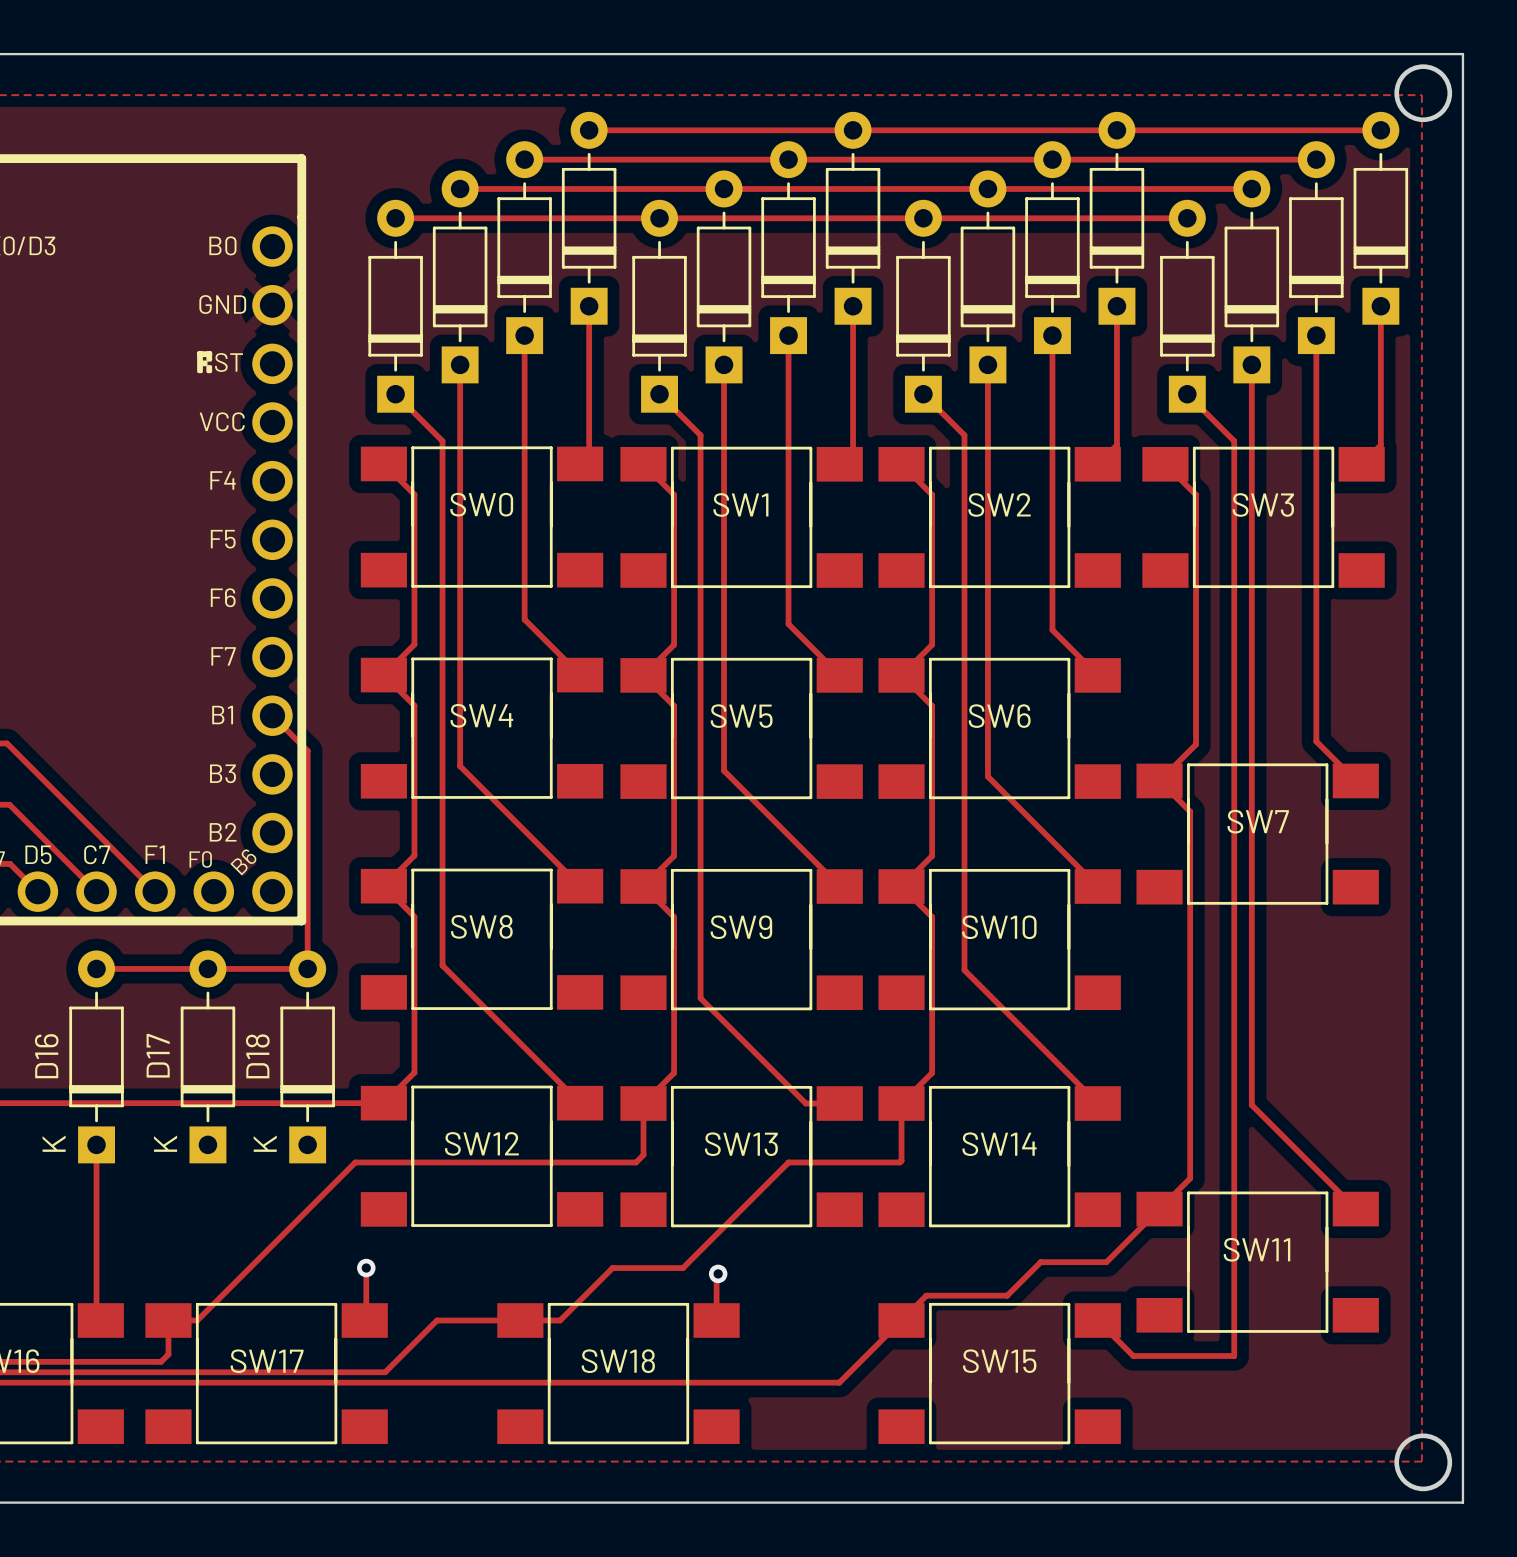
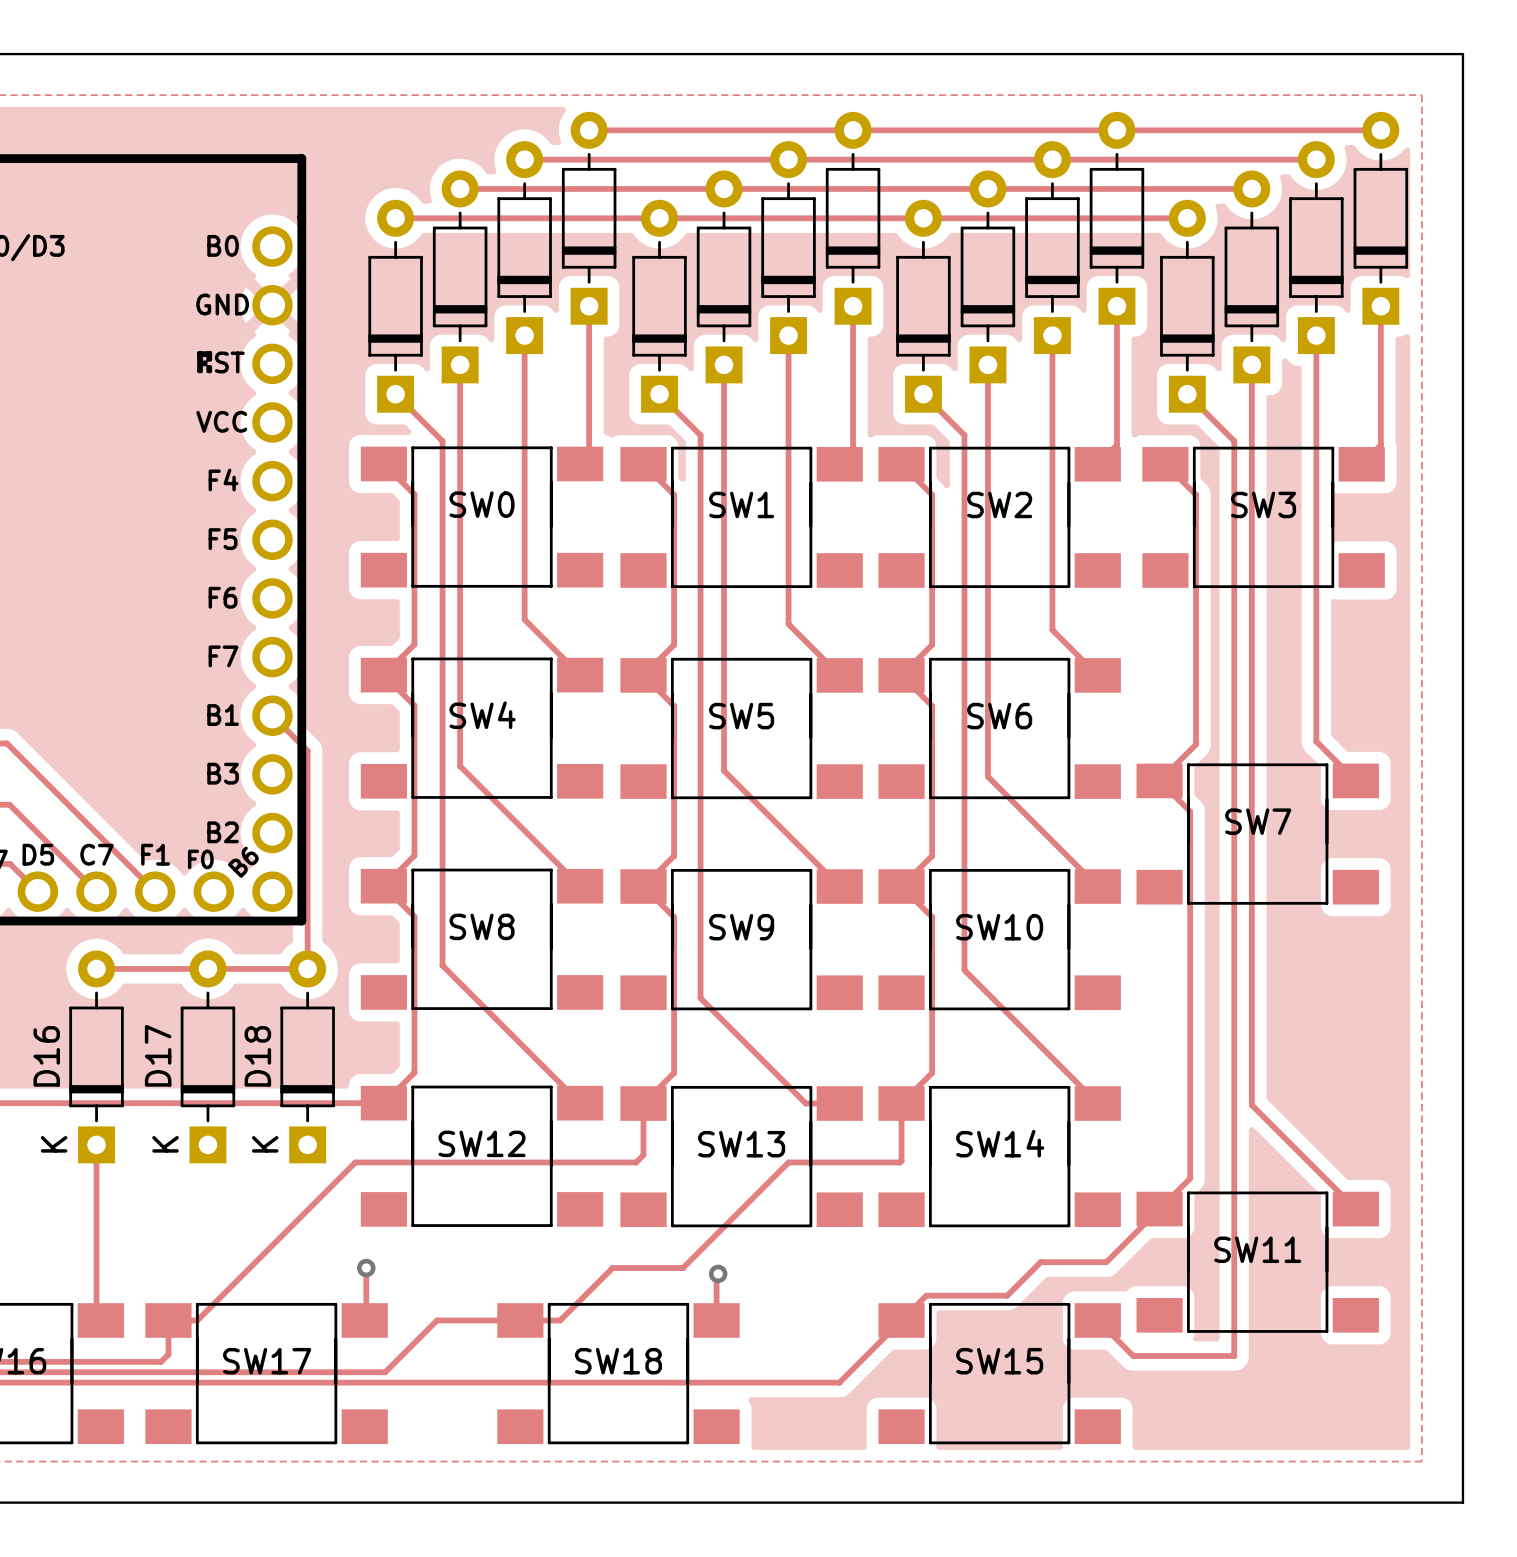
round board edge: [1394, 64, 1453, 123] -> none
round board edge: [1394, 1433, 1453, 1492] -> none

